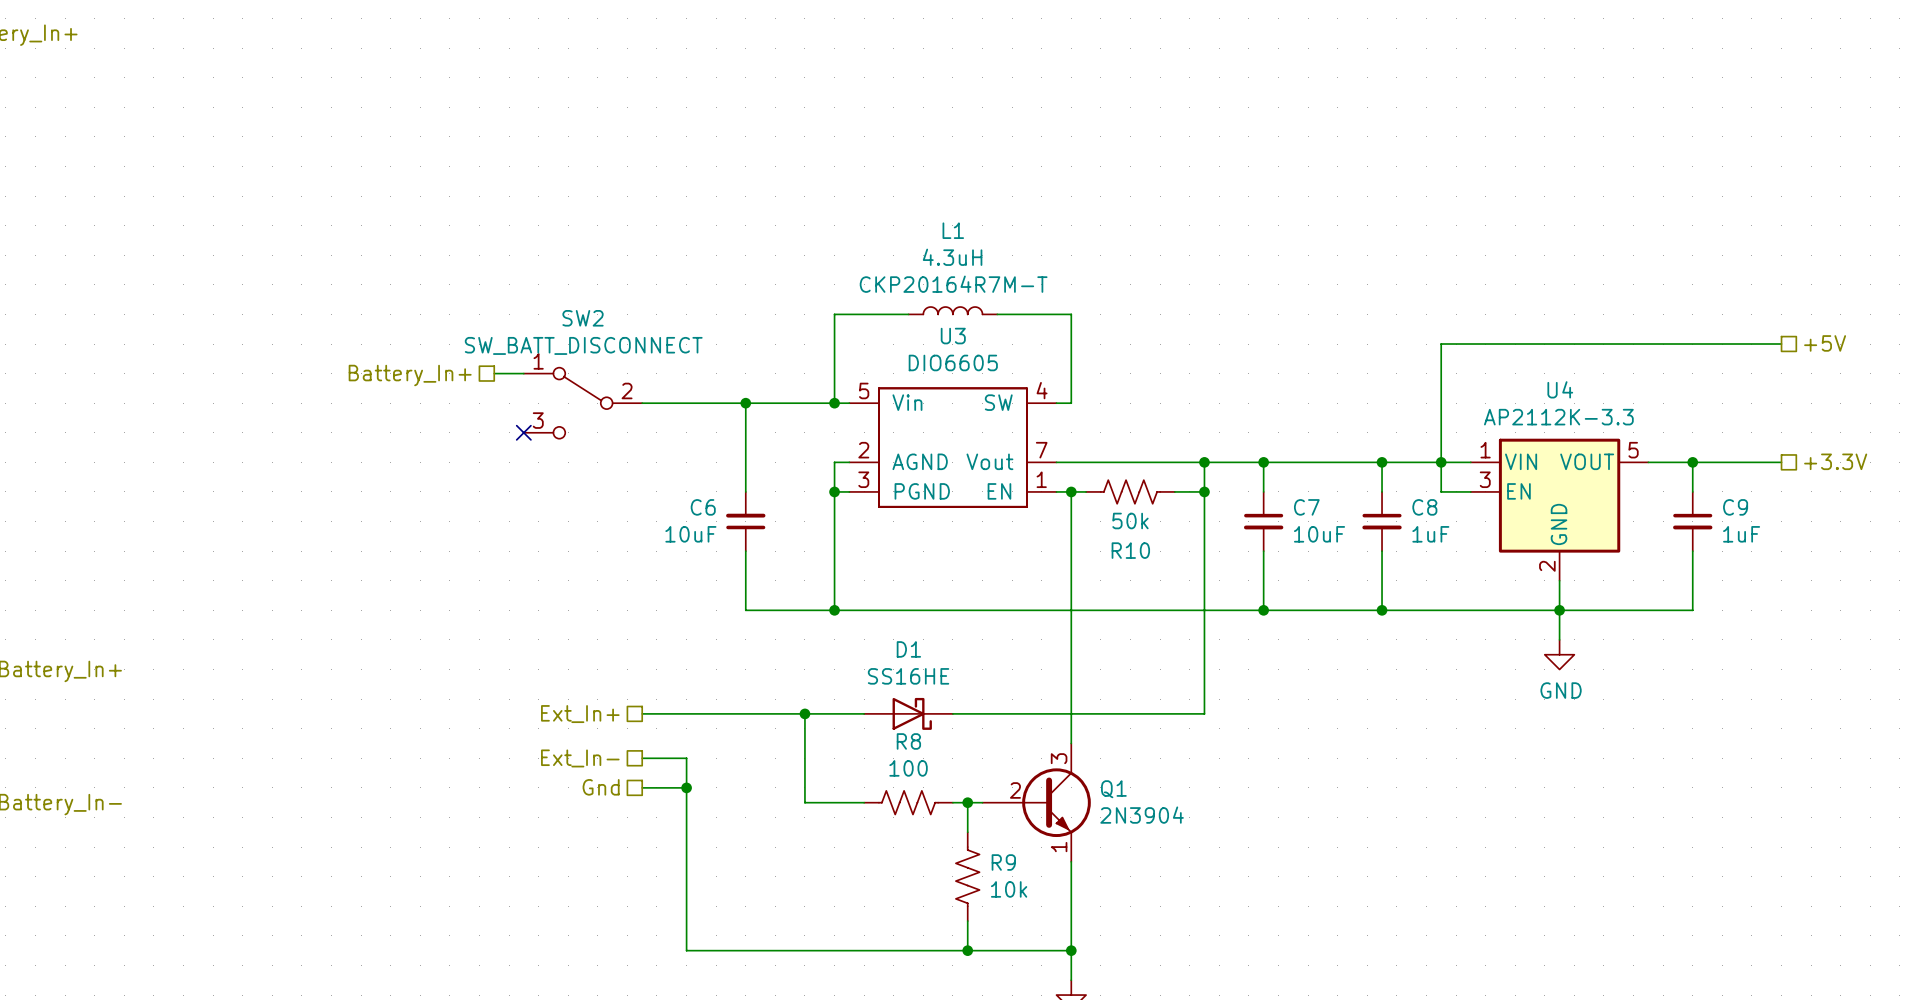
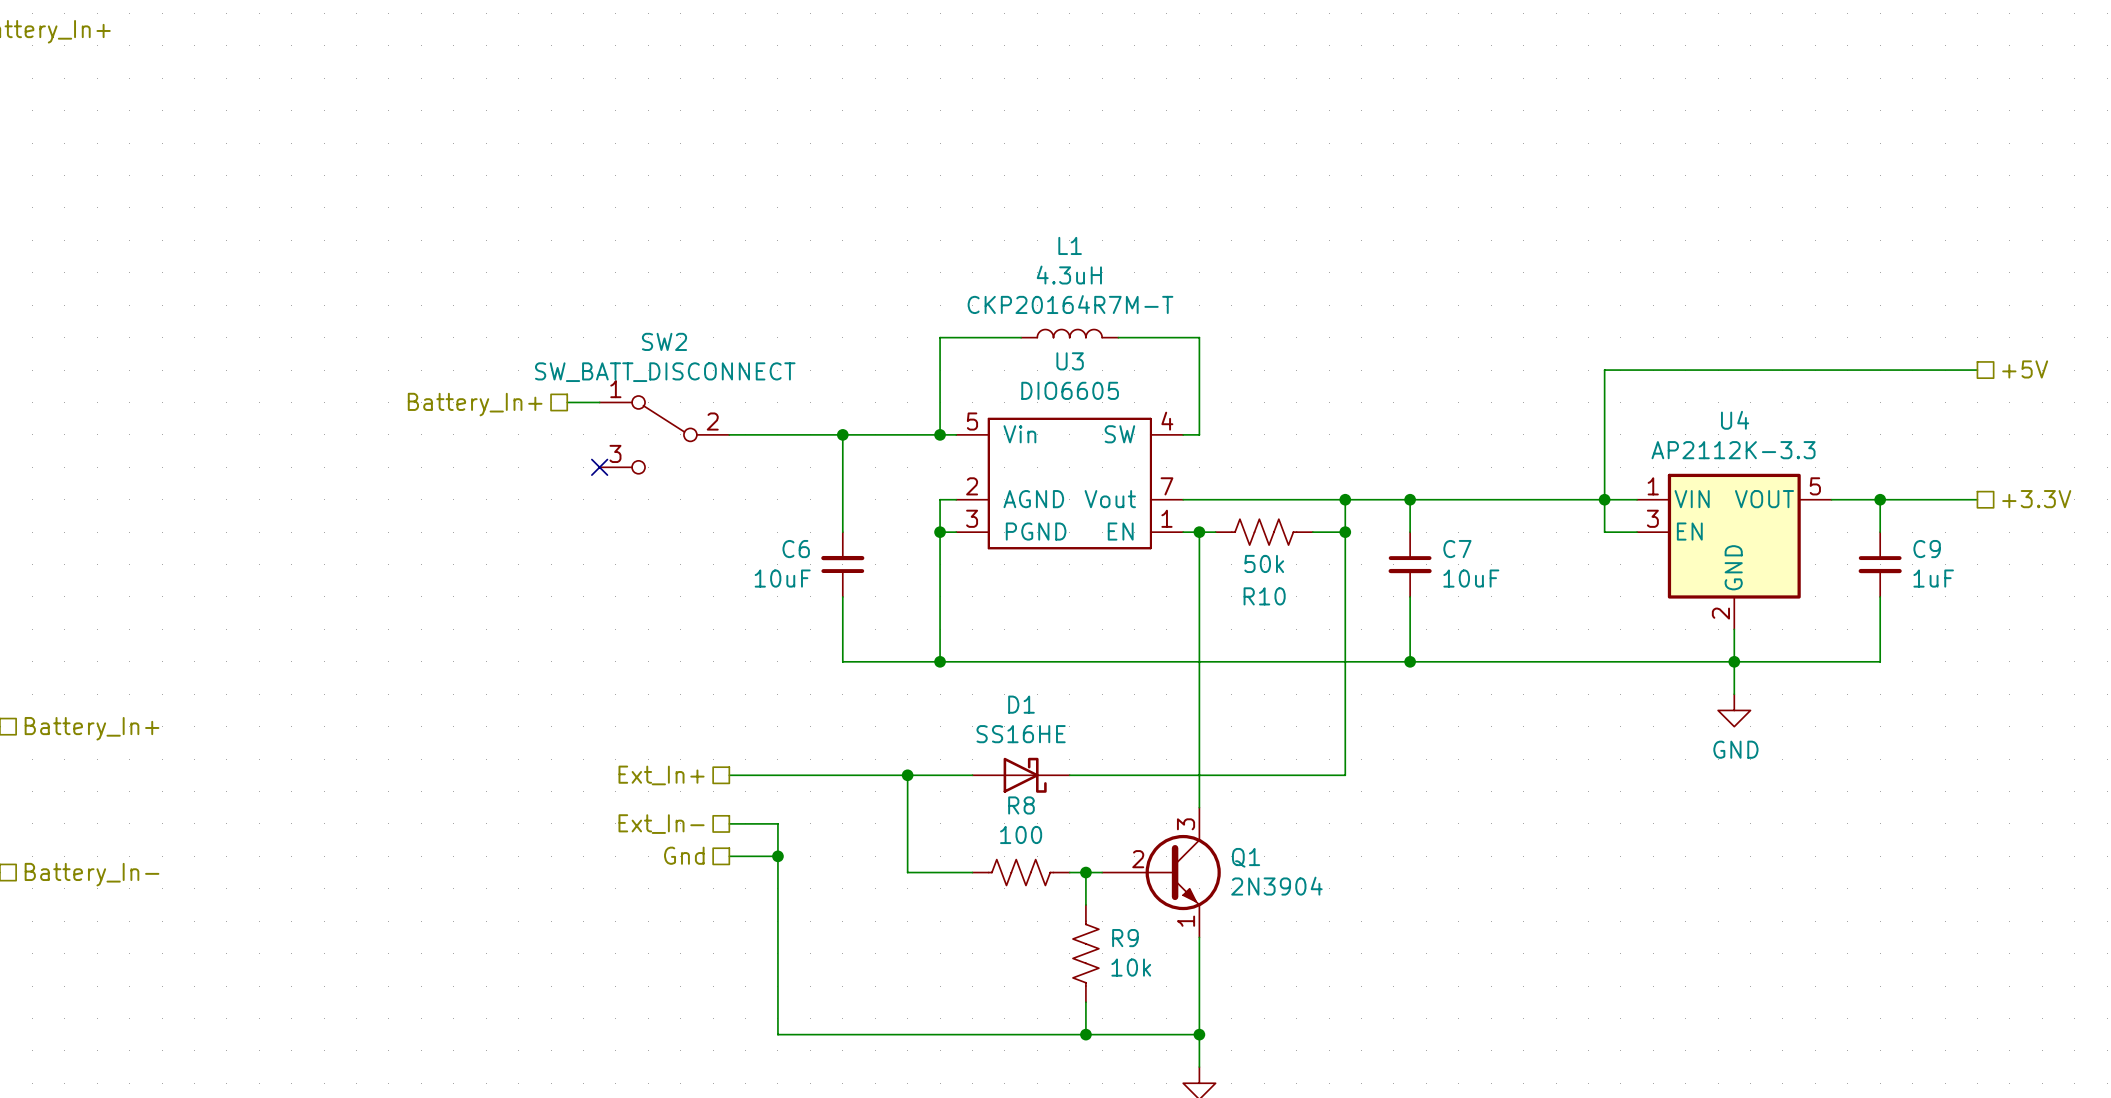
wire: (1382, 462) (1382, 491) -> none
junction: (1382, 462) -> none
C8: 1uF (1382, 521) -> none
wire: (1382, 551) (1382, 610) -> none
junction: (1382, 610) -> none

